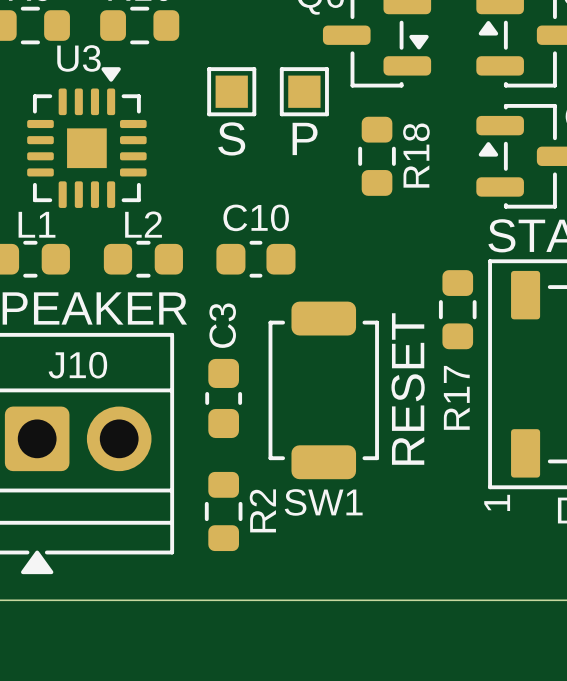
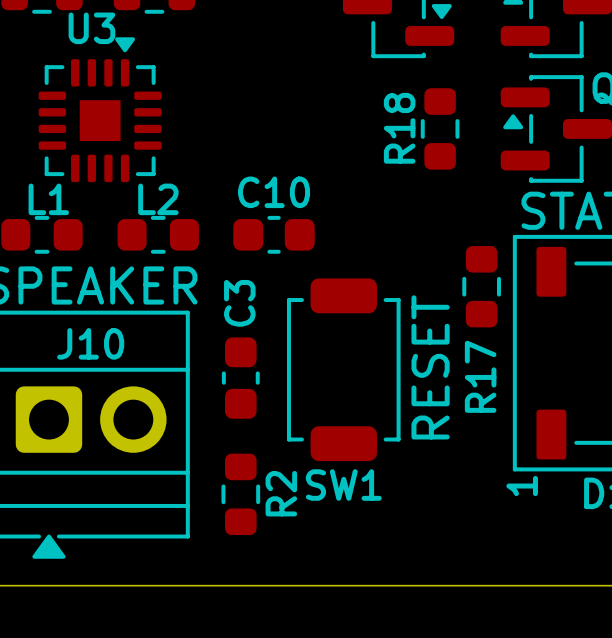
part: (231, 91) -> none
part: (304, 91) -> none
text: S (231, 138) -> none
text: P (305, 138) -> none
R18 name position: R18 (416, 155) -> R18 (399, 128)
R18 position: (377, 156) -> (440, 128)

